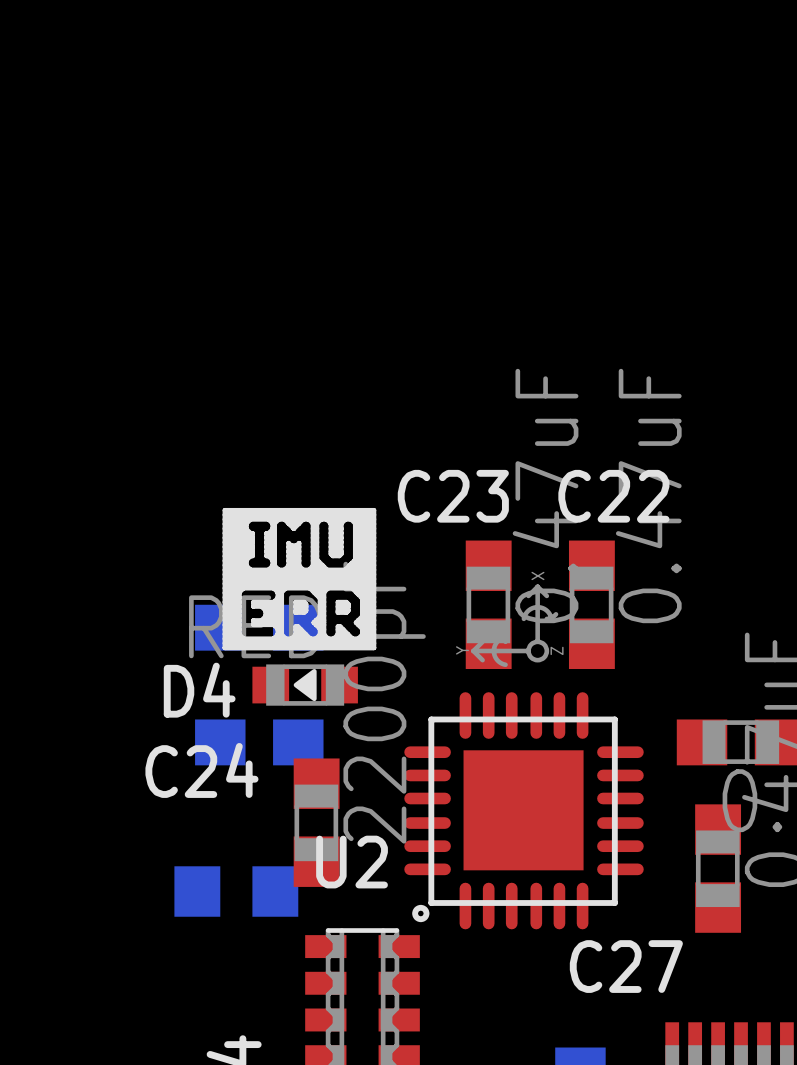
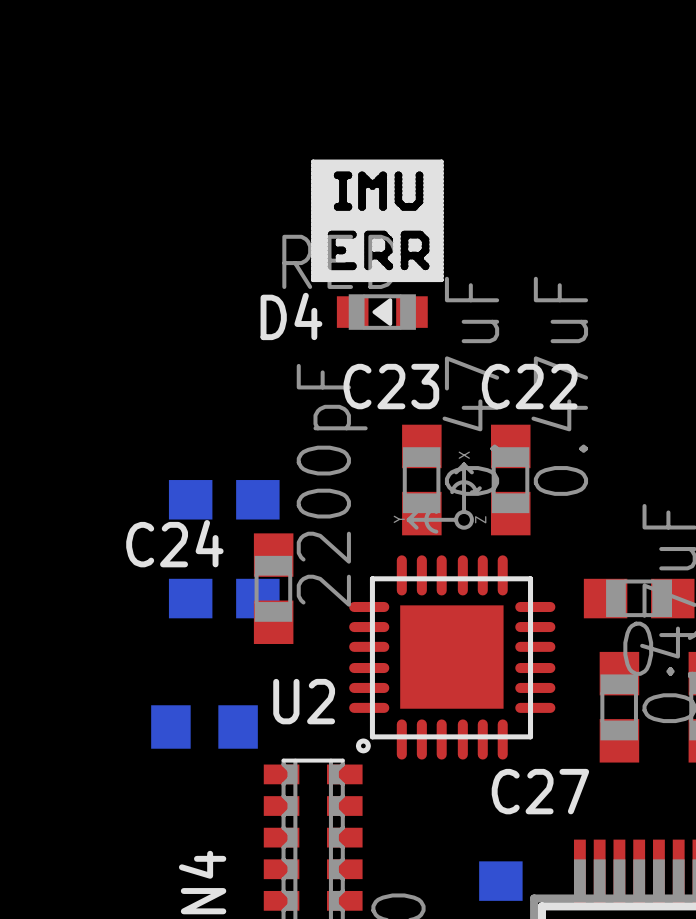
drawing position: (299, 579) -> (377, 220)
D4 position: (305, 685) -> (382, 312)
C24 position: (316, 822) -> (273, 588)

